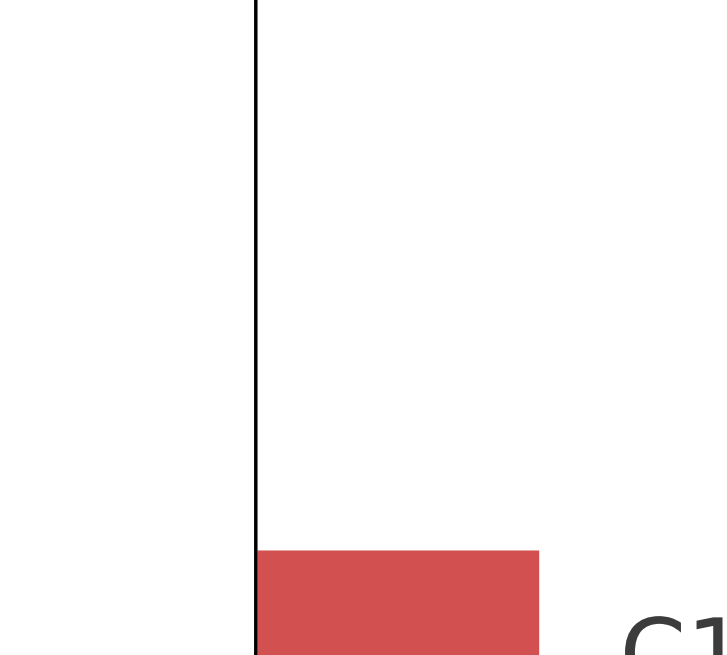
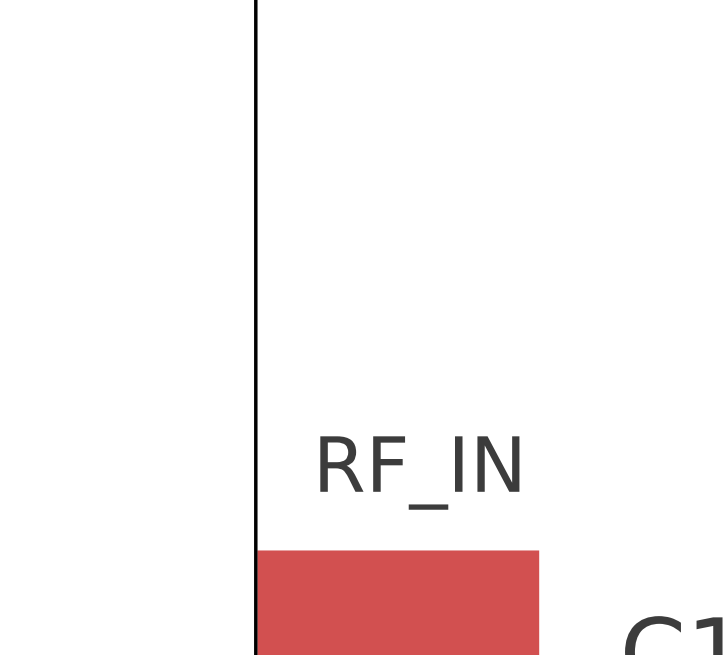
text: none -> RF_IN (419, 473)

